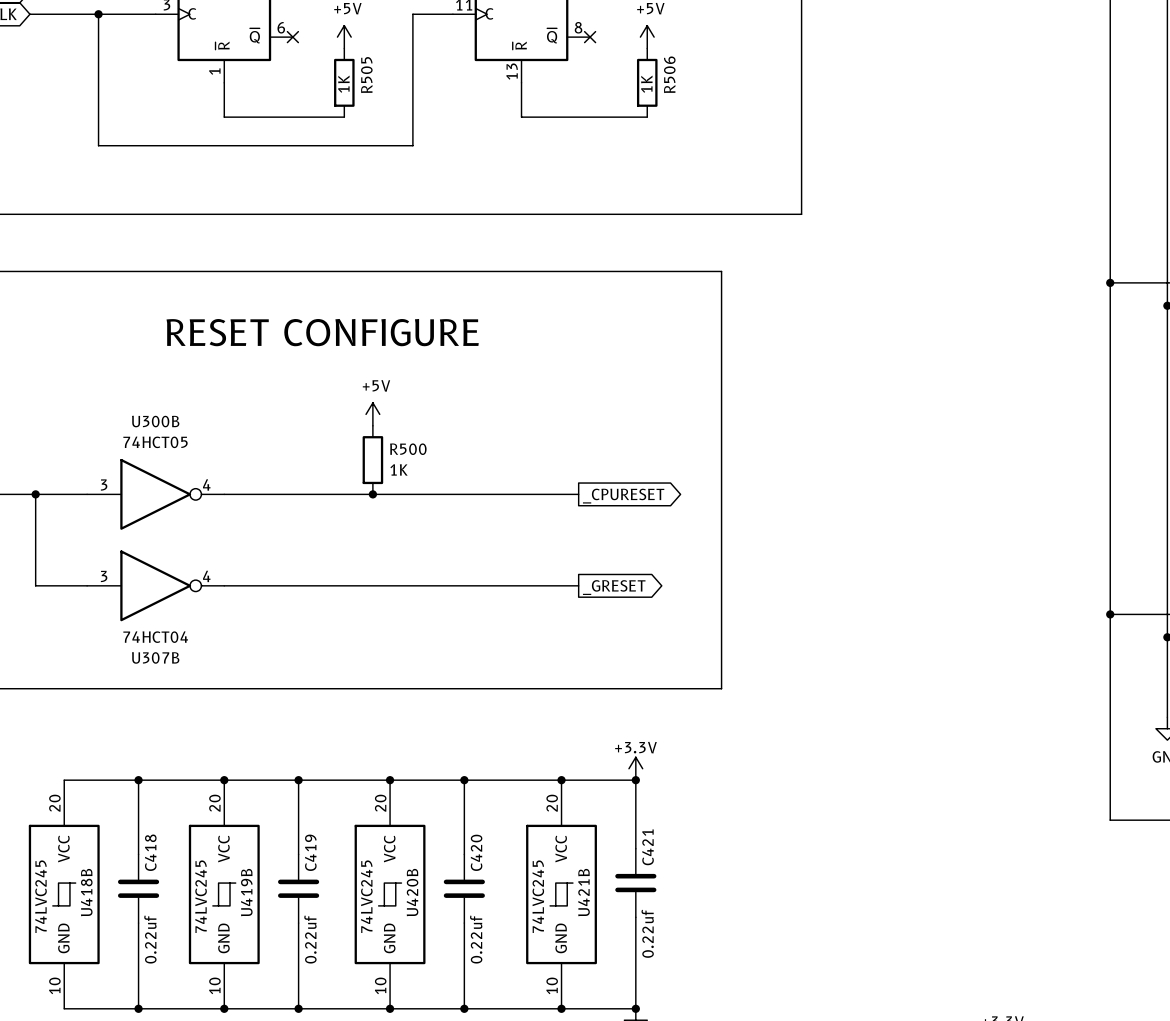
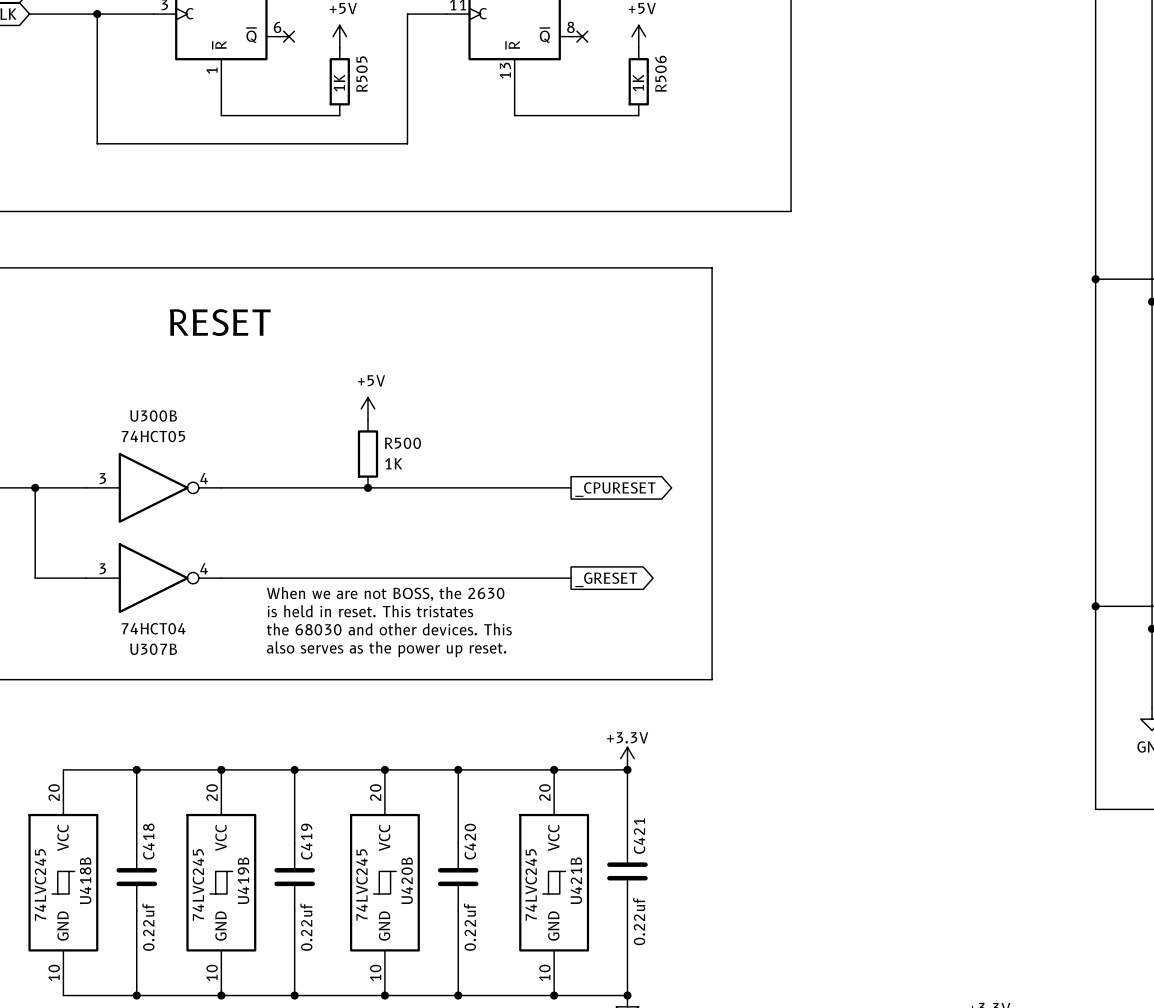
text: none -> RESET (220, 322)
text: RESET CONFIGURE (322, 332) -> none
text: none -> When we are not BOSS, the 2630 (385, 594)
text: none -> is held in reset. This tristates (370, 611)
text: none -> the 68030 and other devices. This (389, 629)
text: none -> also serves as the power up reset. (386, 649)

